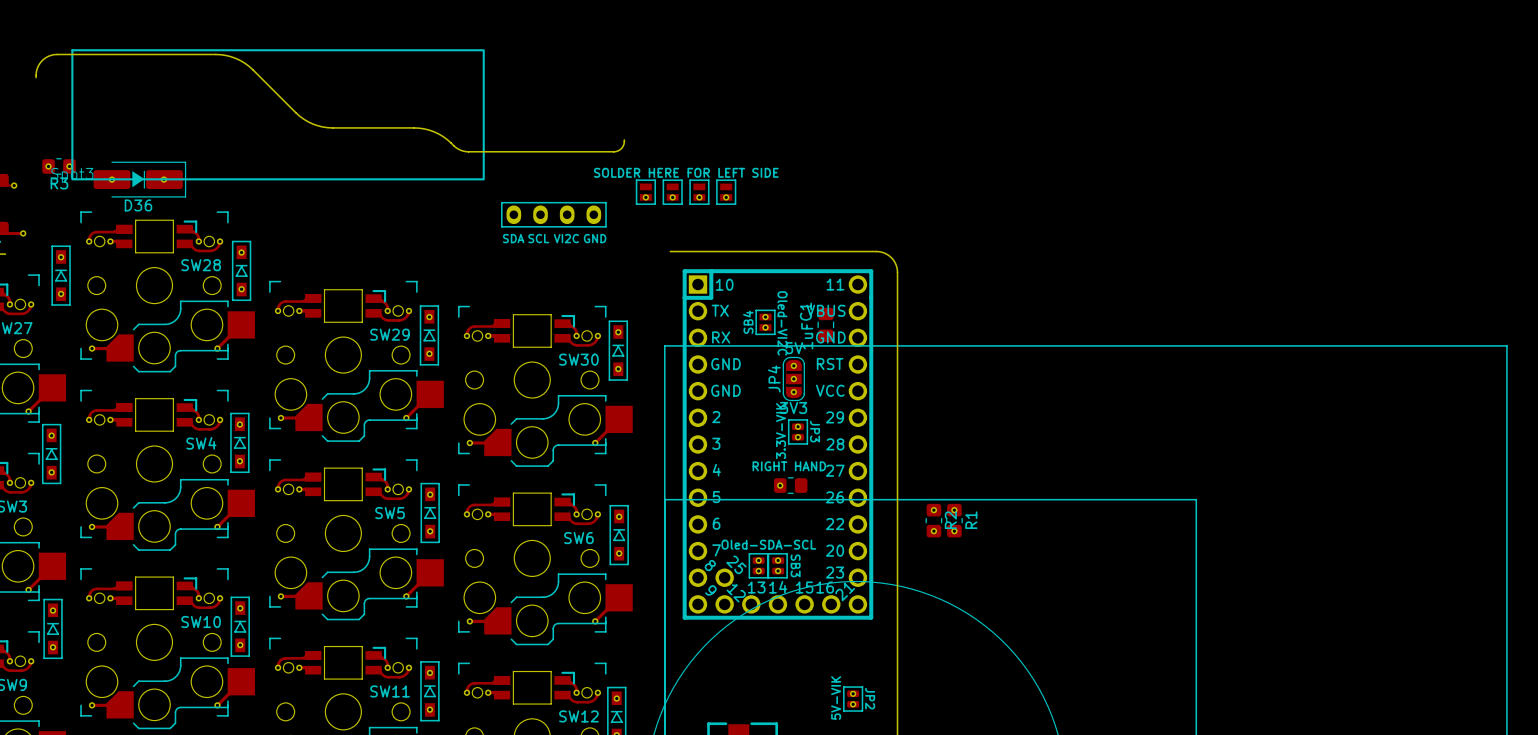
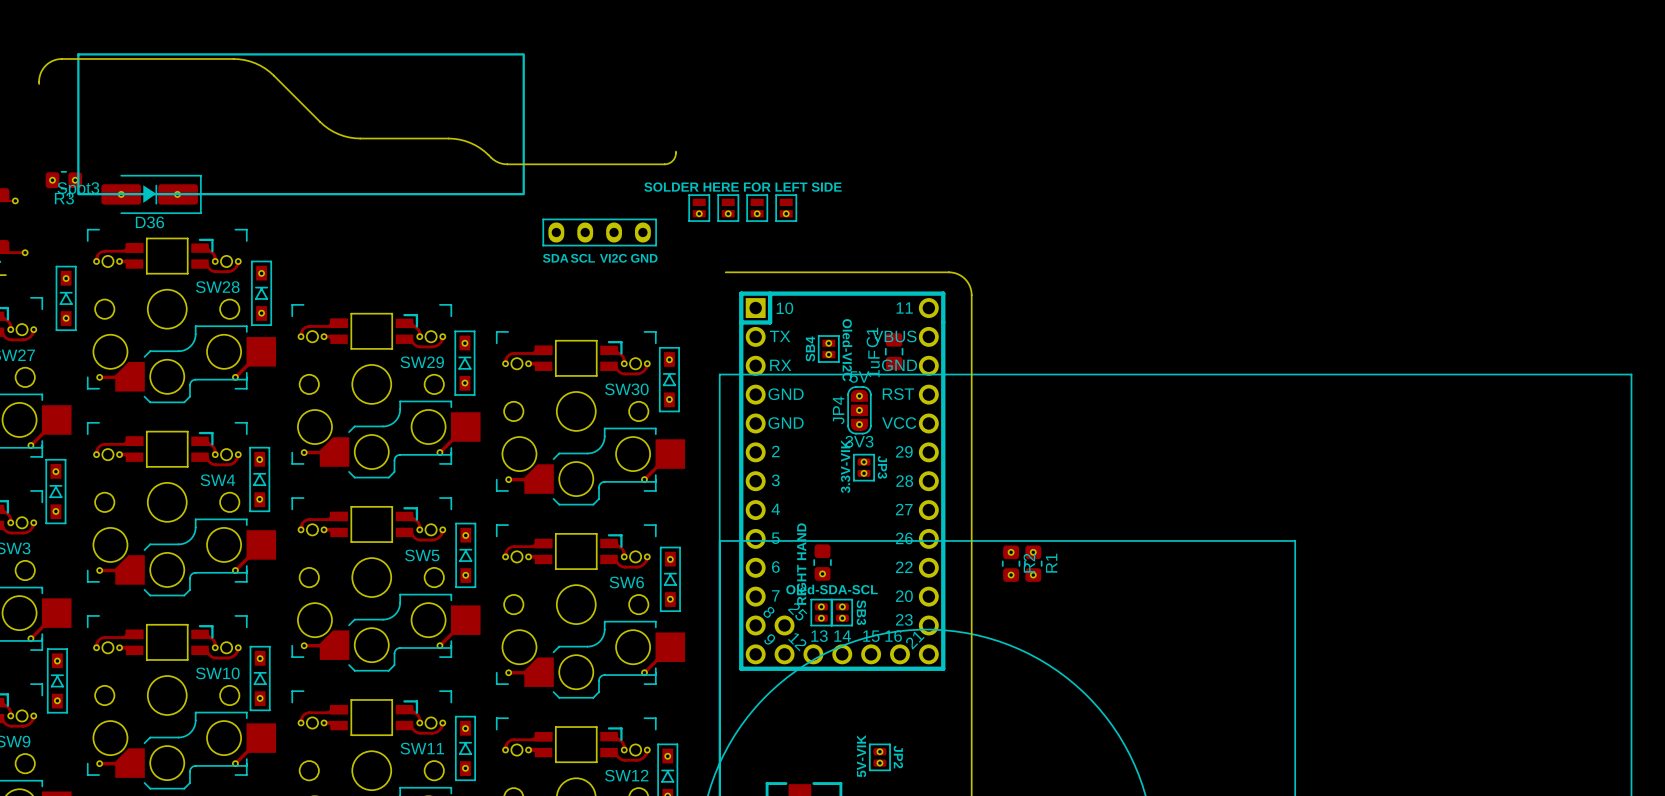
part rotation: 0° (790, 485) -> 90° counterclockwise (822, 562)
part position: (790, 485) -> (822, 562)
JP2 position: (853, 699) -> (879, 757)

